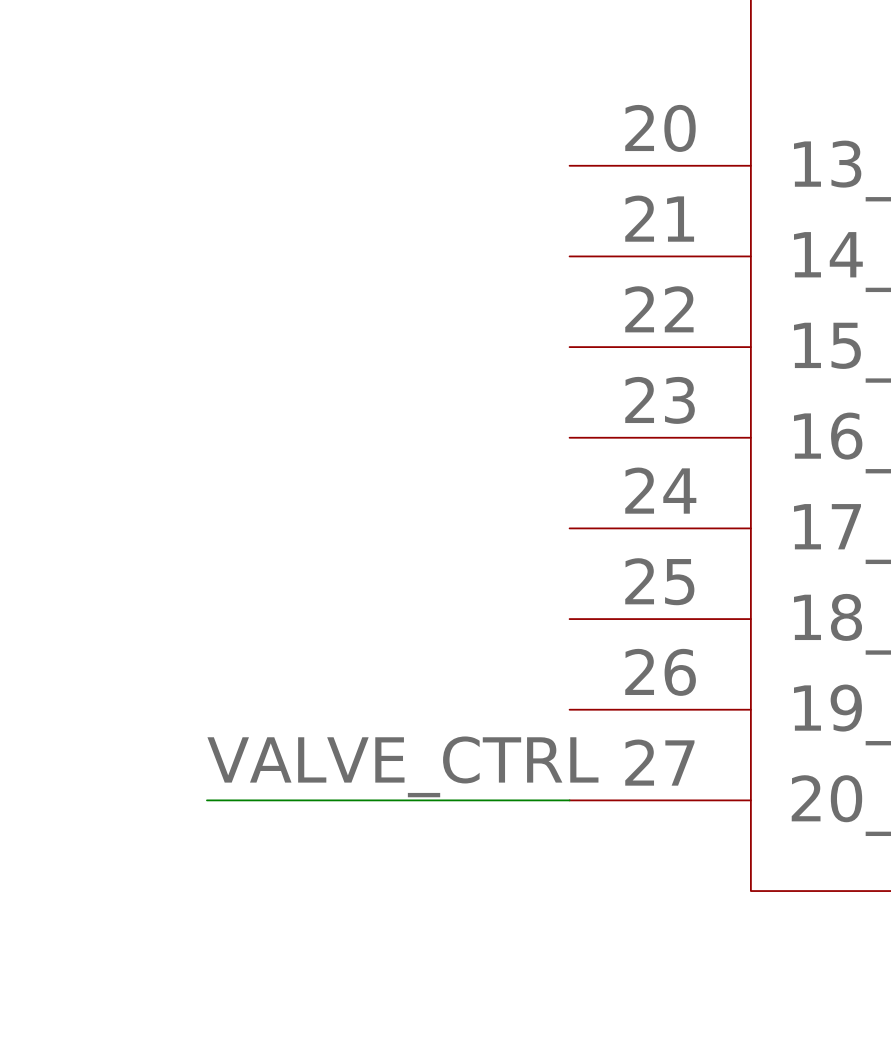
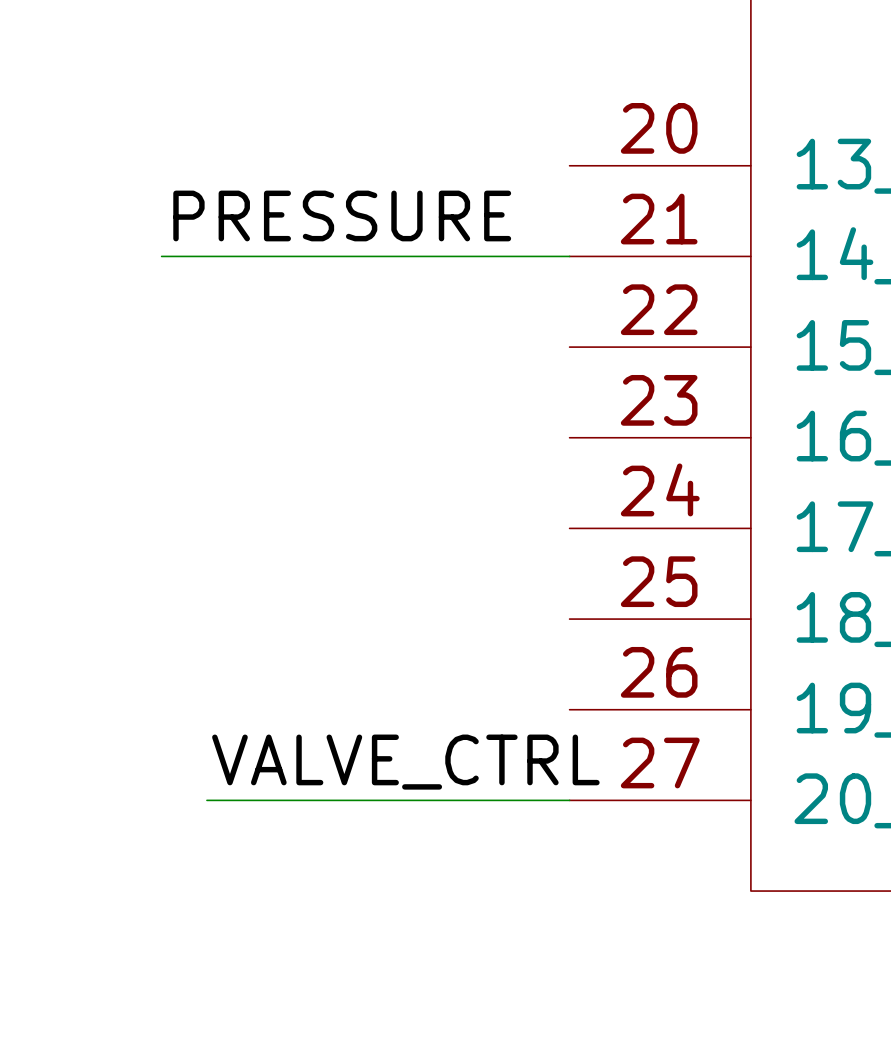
label: none -> PRESSURE (342, 215)
wire: none -> (161, 256) (569, 256)

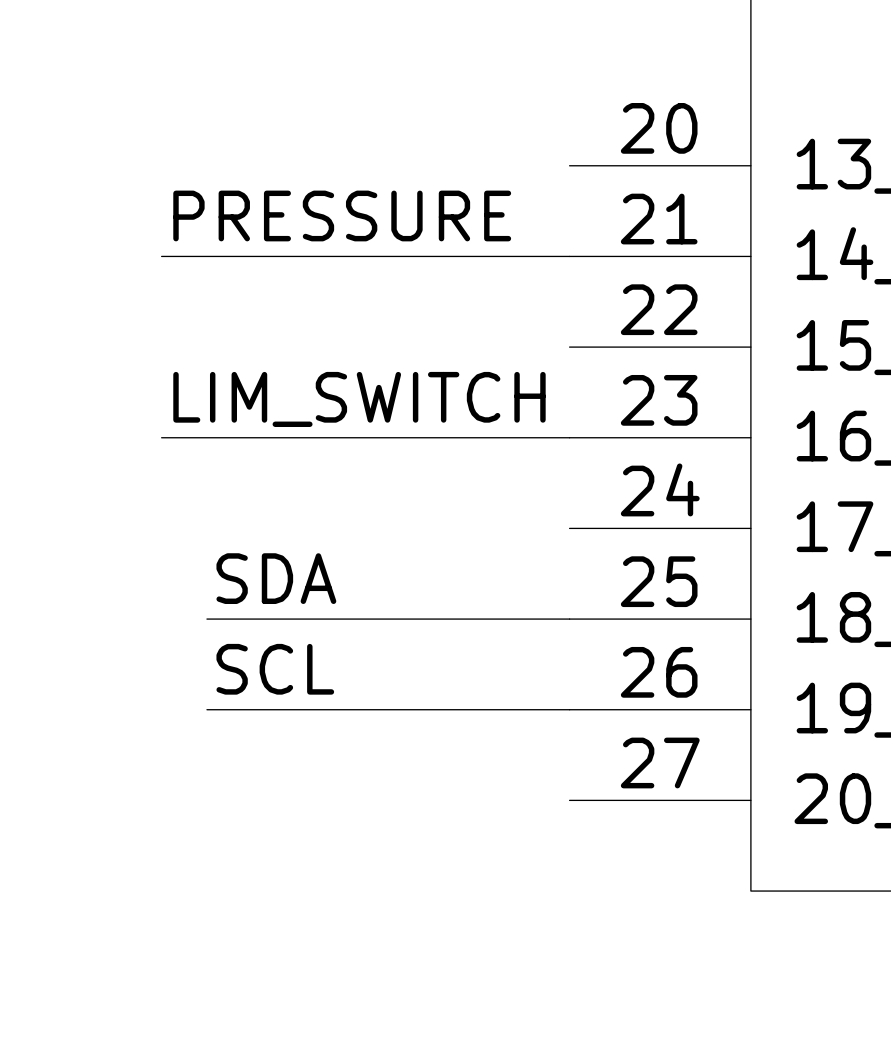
label: none -> LIM_SWITCH (359, 399)
wire: none -> (161, 437) (569, 437)
label: none -> SDA (276, 578)
wire: none -> (206, 619) (569, 619)
label: none -> SCL (275, 669)
label: VALVE_CTRL (405, 762) -> none
wire: (206, 800) (569, 800) -> (206, 709) (569, 709)

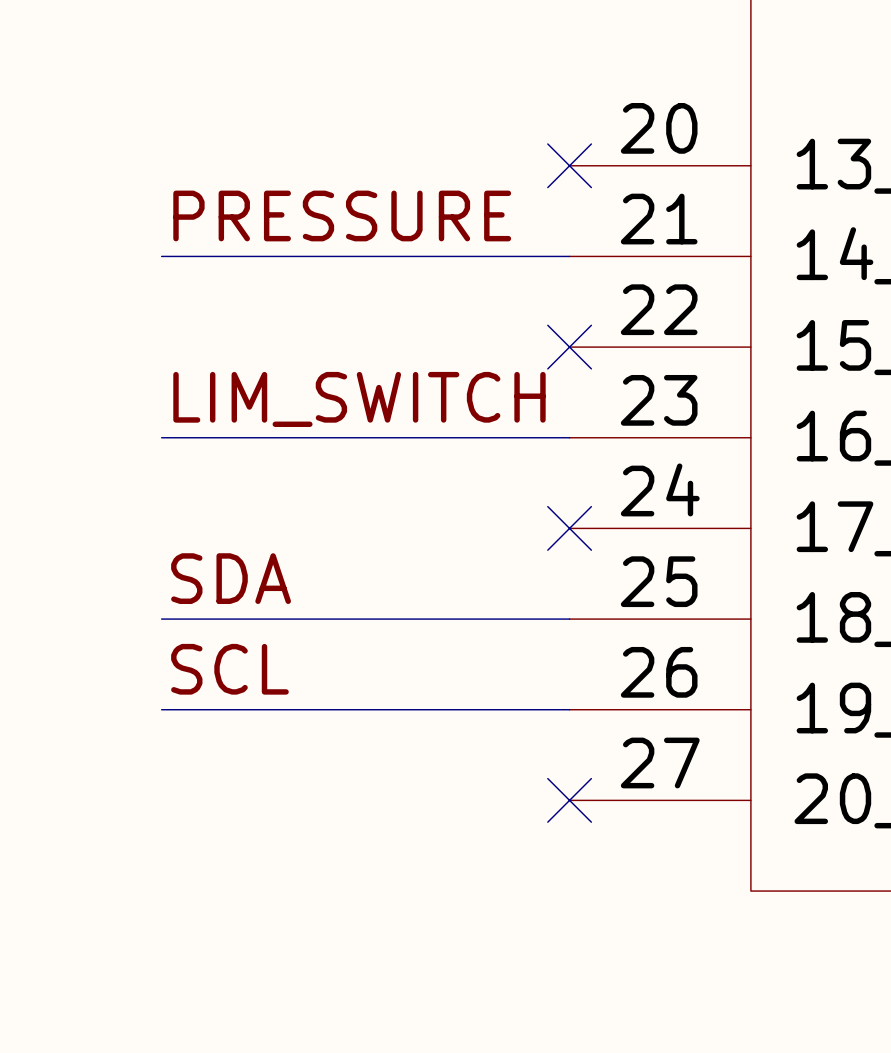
no-connect mark: none -> (569, 165)
no-connect mark: none -> (569, 347)
no-connect mark: none -> (569, 528)
label position: SDA (276, 578) -> SDA (231, 578)
wire: none -> (161, 619) (206, 619)
label position: SCL (275, 669) -> SCL (229, 669)
wire: none -> (161, 709) (206, 709)
no-connect mark: none -> (569, 800)

